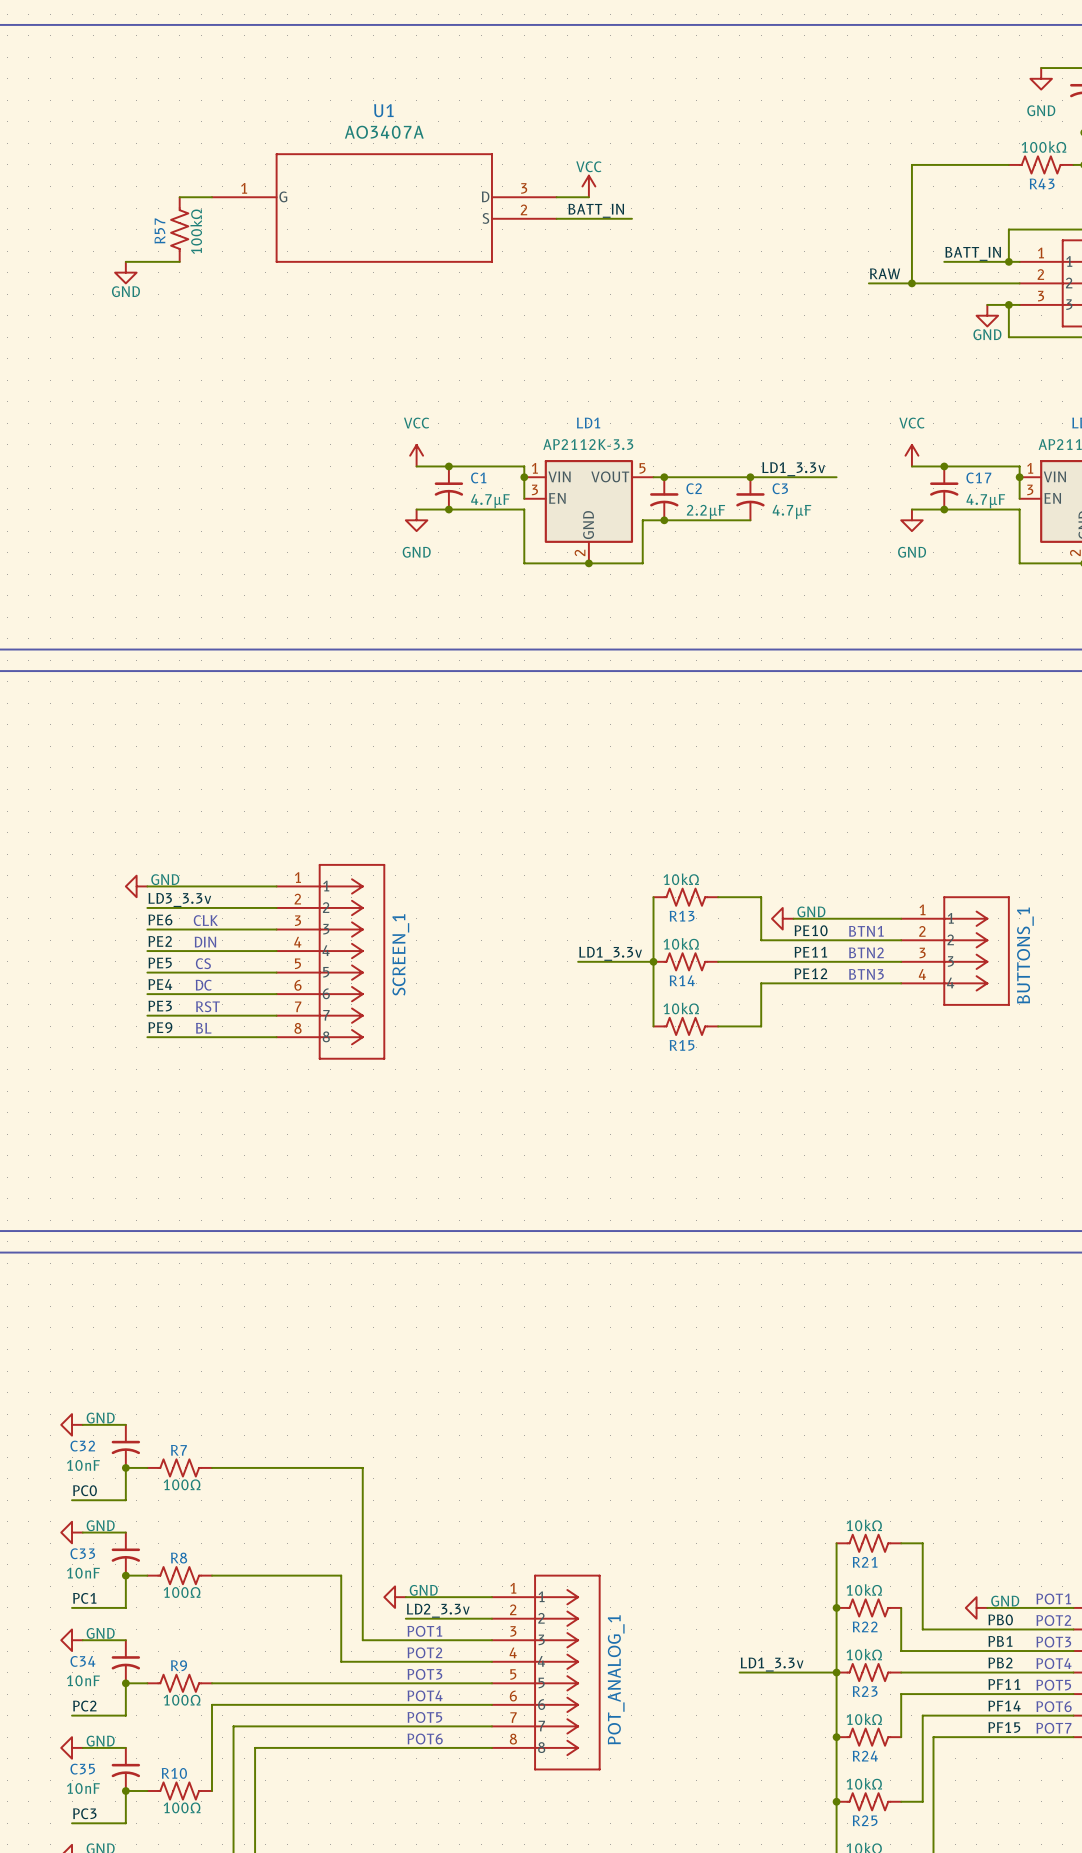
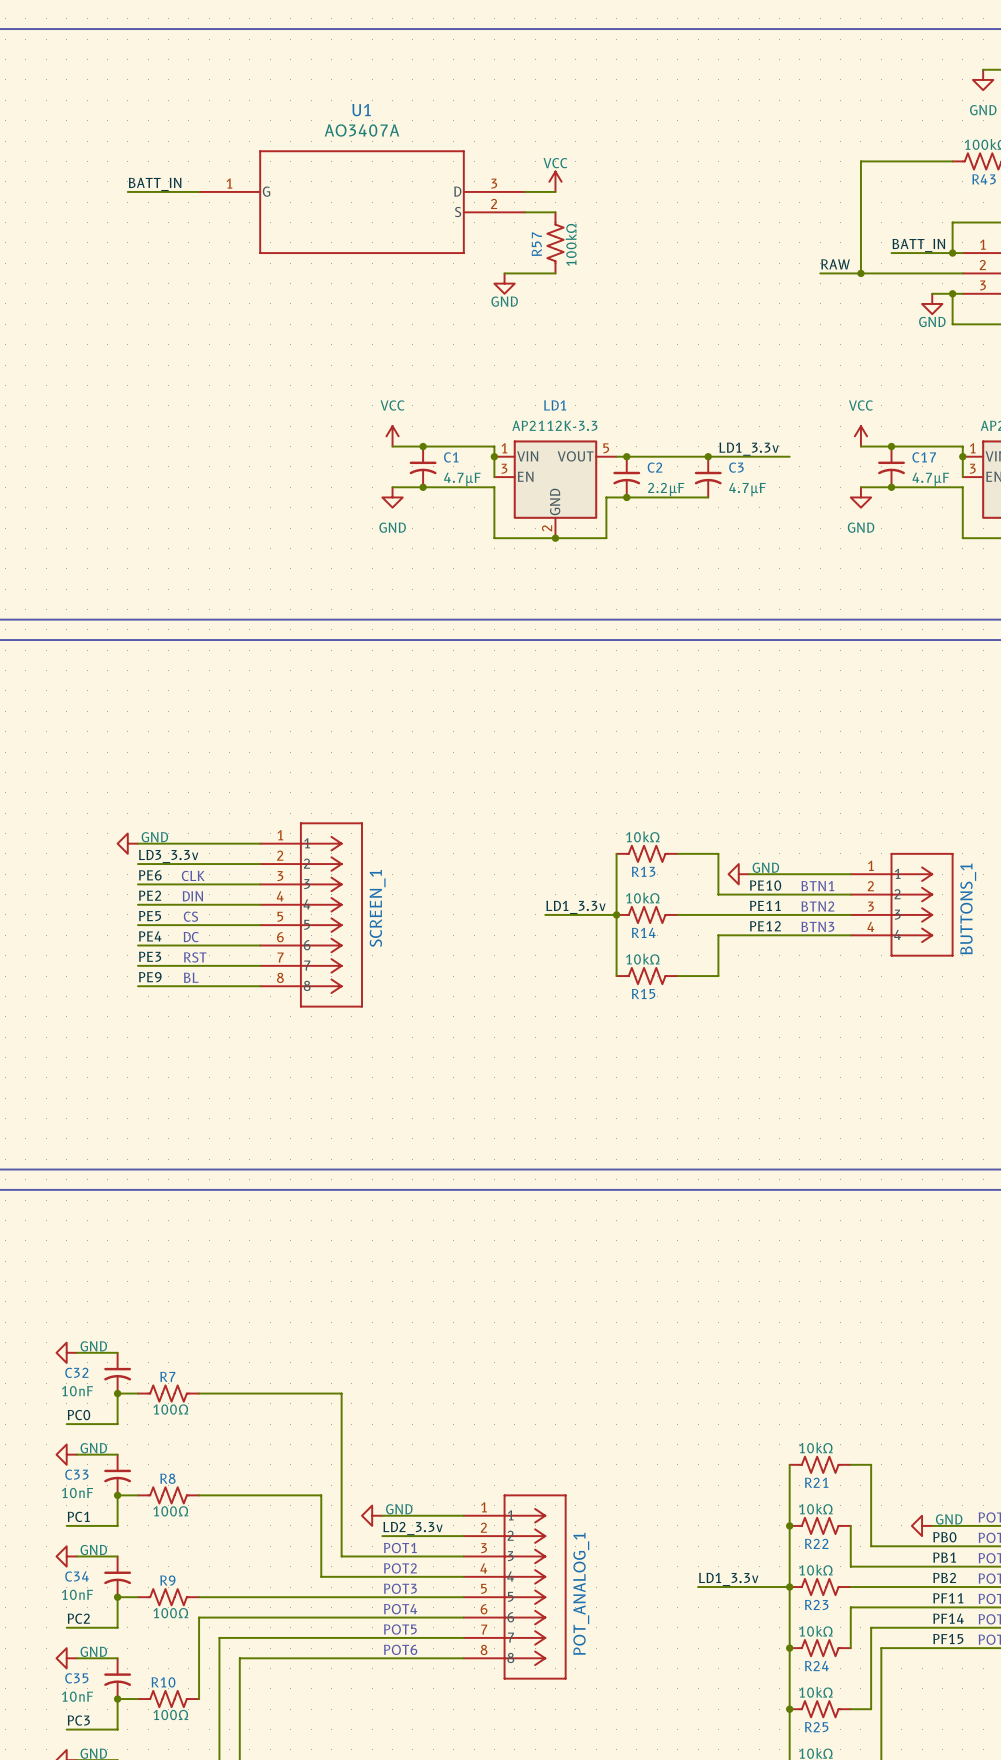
label: none -> BATT_IN (155, 184)
wire: none -> (127, 191) (168, 191)
label: BATT_IN (596, 210) -> none
wire: (588, 218) (631, 218) -> none
R57 position: (179, 229) -> (555, 242)
wire: (125, 261) (179, 261) -> none
power symbol: GND (125, 272) -> none
wire: none -> (504, 273) (555, 273)
power symbol: none -> GND (504, 283)

